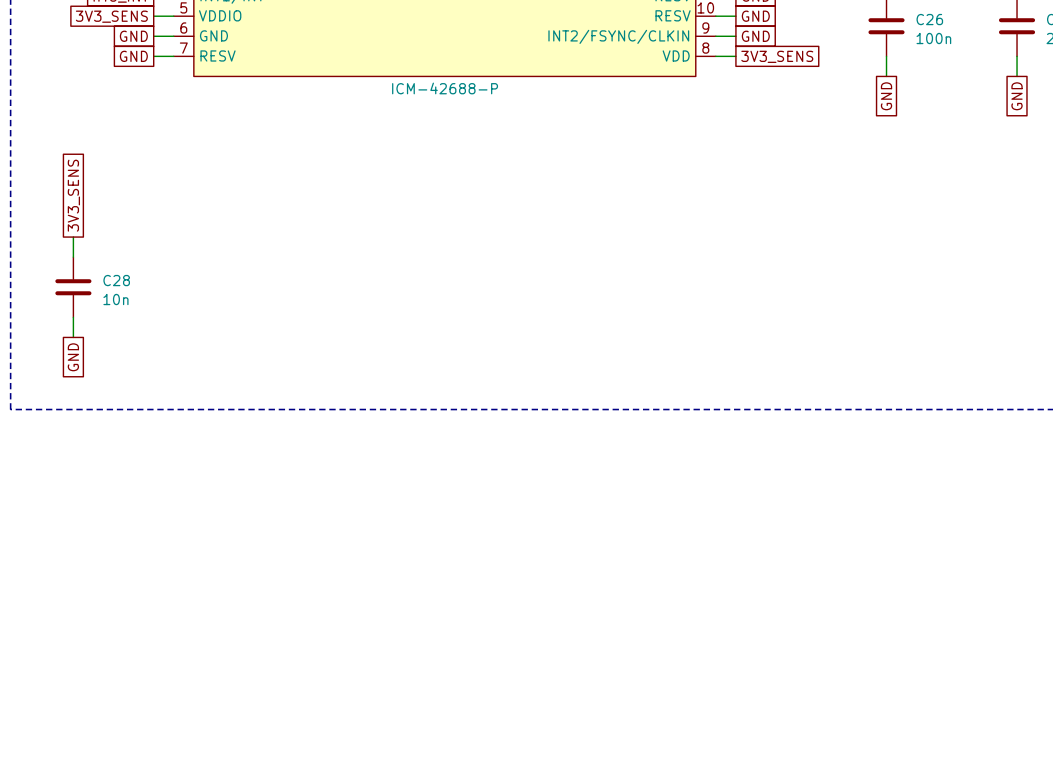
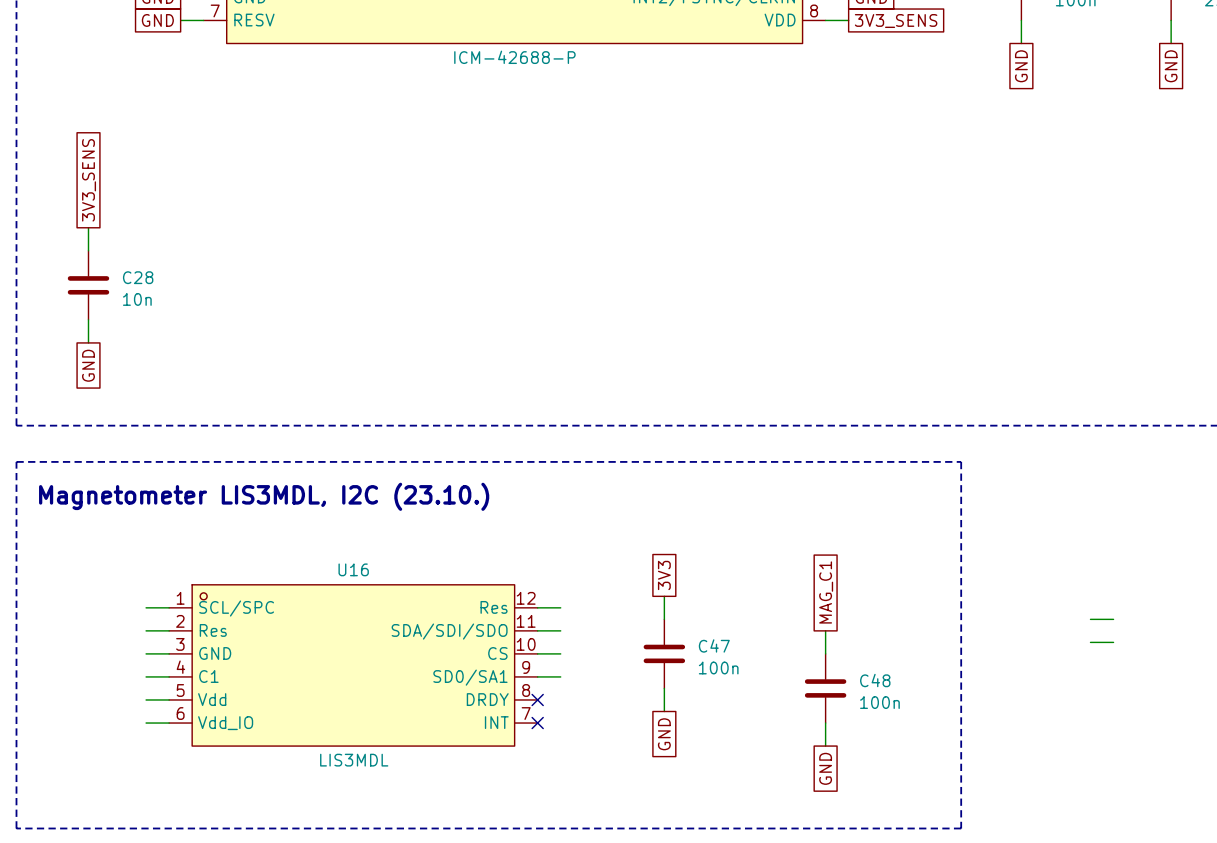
line: none -> (16, 461) (961, 461) (961, 828) (16, 828) (16, 461)
text: none -> Magnetometer LIS3MDL, I2C (23.10.) (264, 496)
global label: none -> 3V3 (664, 575)
global label: none -> MAG_C1 (826, 592)
wire: none -> (664, 596) (664, 619)
wire: none -> (146, 607) (169, 607)
wire: none -> (537, 607) (560, 607)
wire: none -> (1090, 619) (1113, 619)
wire: none -> (146, 630) (169, 630)
wire: none -> (537, 630) (560, 630)
wire: none -> (825, 630) (825, 653)
wire: none -> (1090, 642) (1113, 642)
wire: none -> (146, 653) (169, 653)
wire: none -> (537, 653) (560, 653)
C47: none -> 100n (664, 653)
U16: none -> LIS3MDL (353, 665)
wire: none -> (146, 676) (169, 676)
wire: none -> (537, 676) (560, 676)
wire: none -> (664, 688) (664, 711)
C48: none -> 100n (825, 688)
wire: none -> (146, 699) (169, 699)
no-connect mark: none -> (537, 699)
wire: none -> (146, 723) (169, 723)
no-connect mark: none -> (537, 723)
wire: none -> (825, 723) (825, 746)
global label: none -> GND (664, 734)
global label: none -> GND (825, 768)

